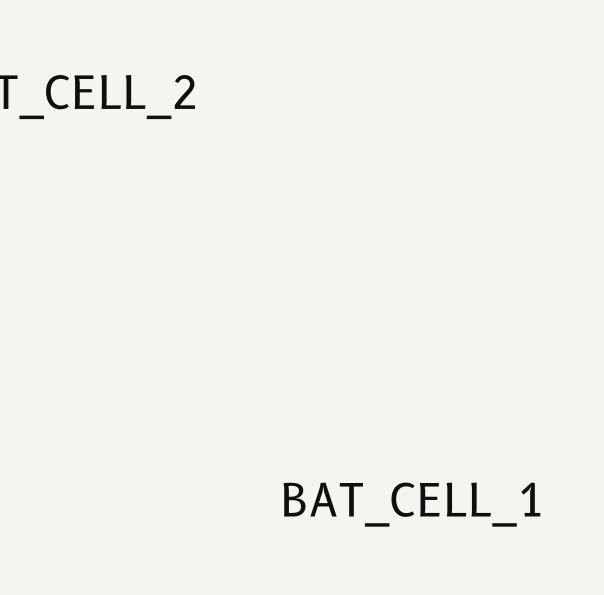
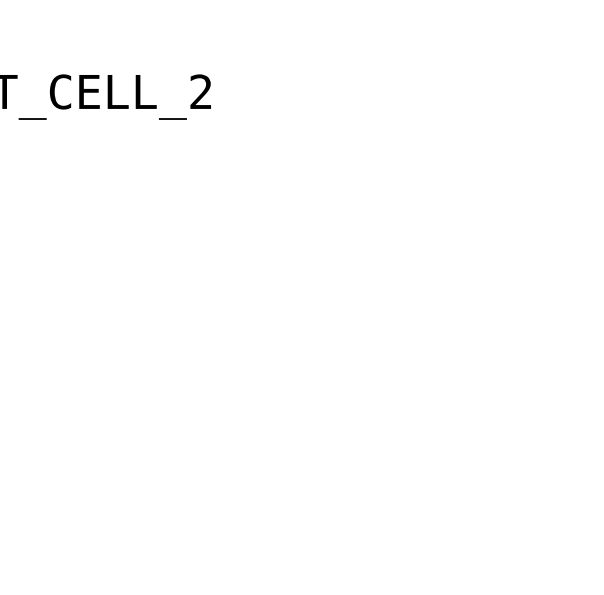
label: BAT_CELL_1 (411, 504) -> none

